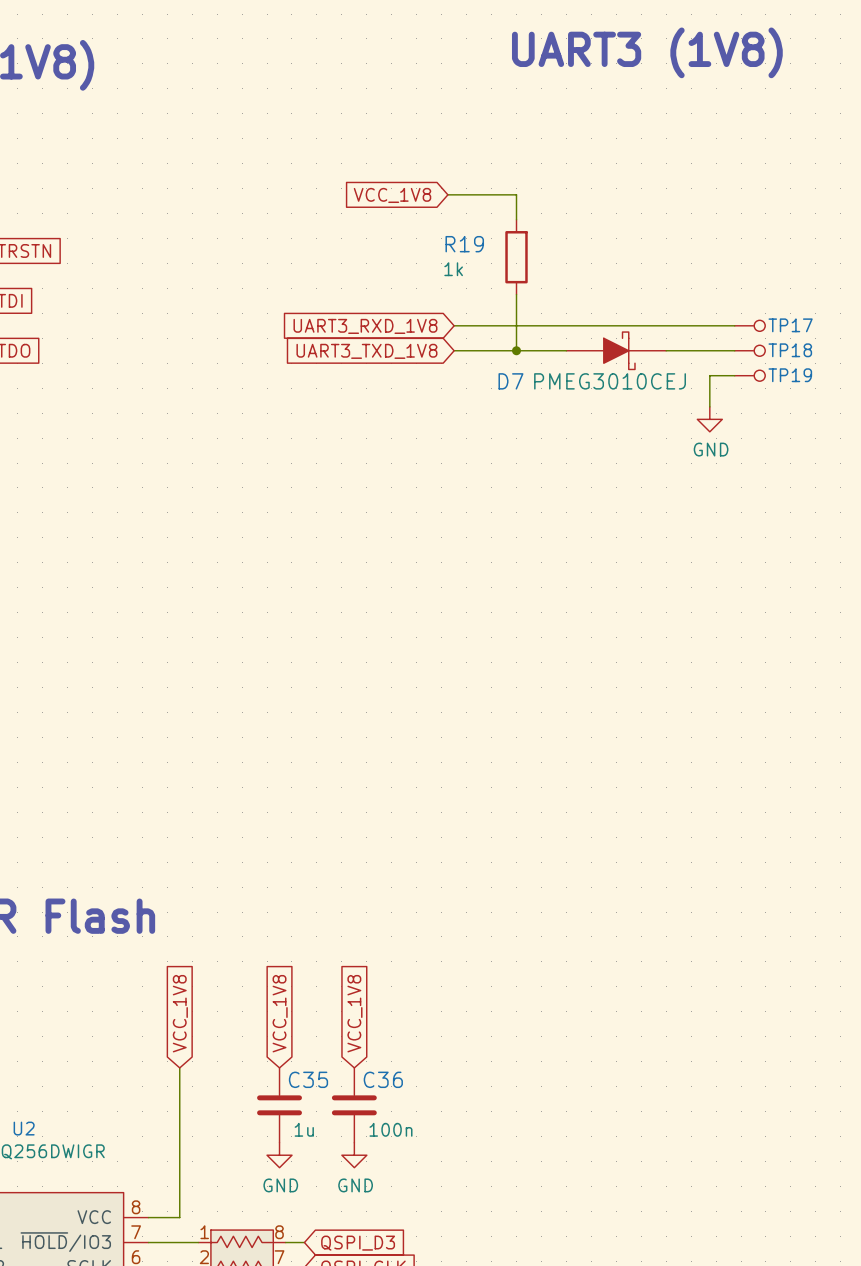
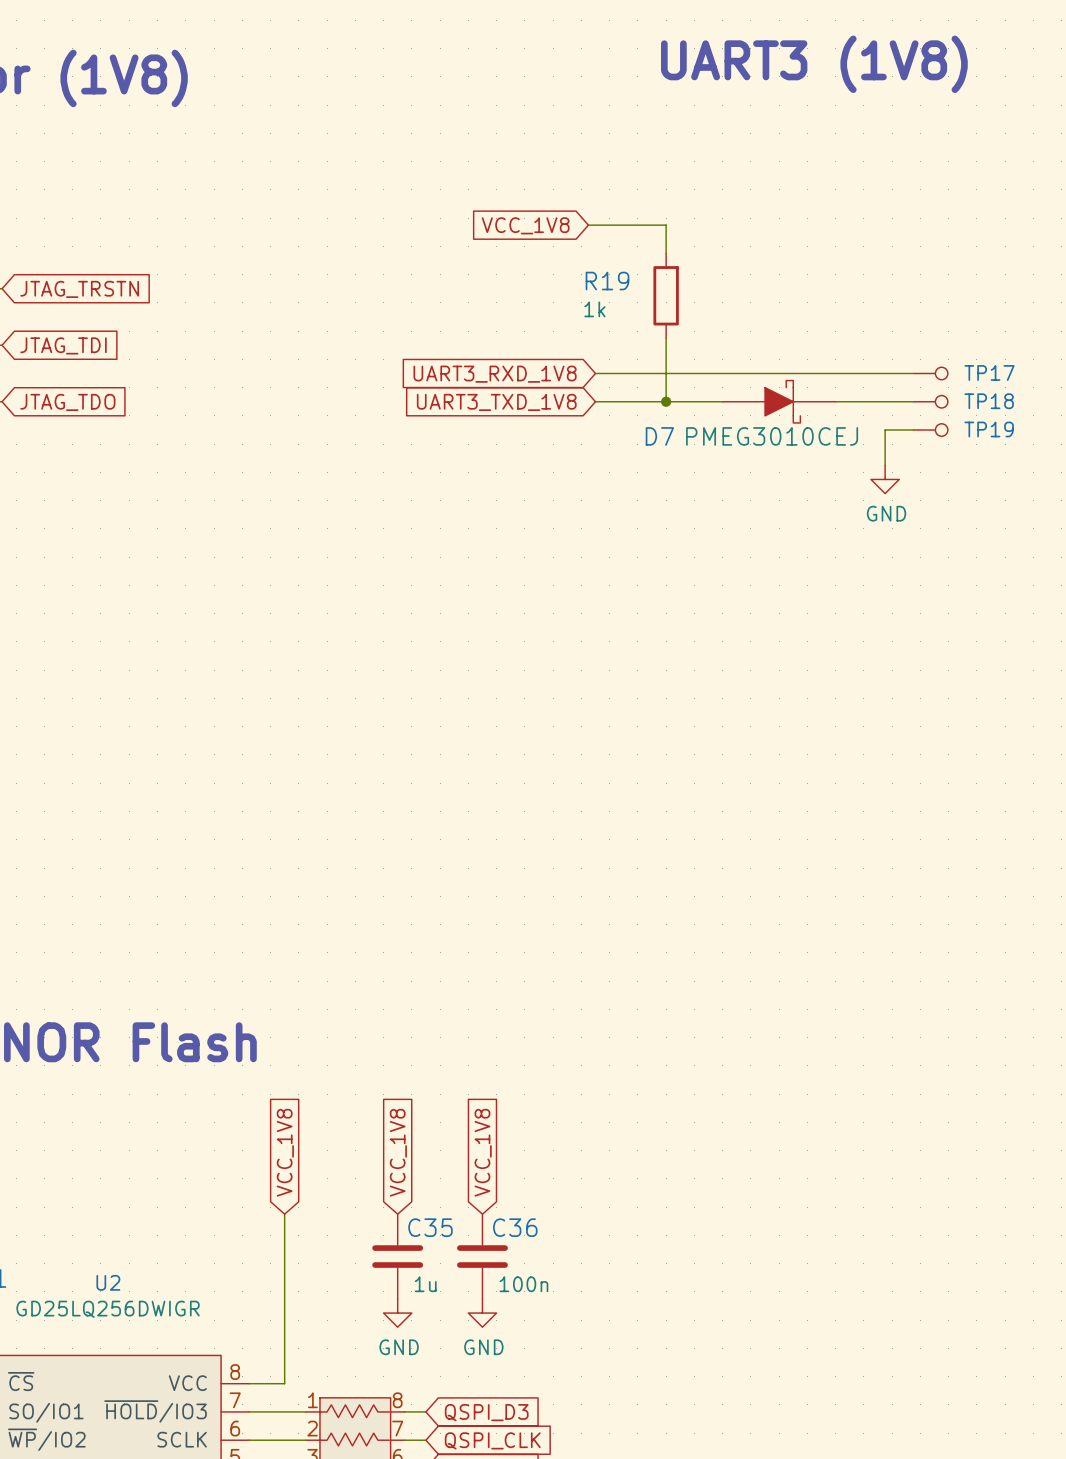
TP17 name position: TP17 (790, 325) -> TP17 (989, 372)
TP18 name position: TP18 (790, 350) -> TP18 (989, 401)
TP19 name position: TP19 (790, 375) -> TP19 (989, 429)

